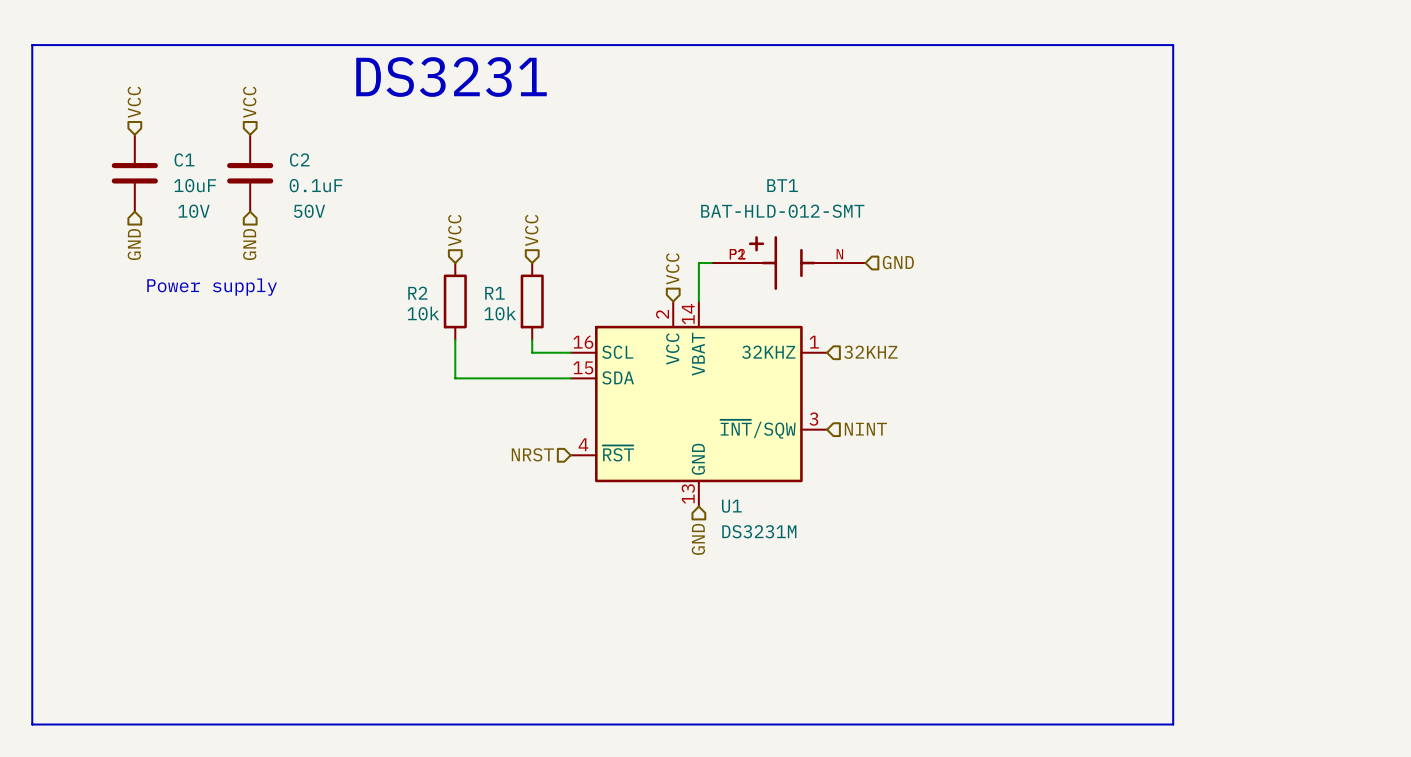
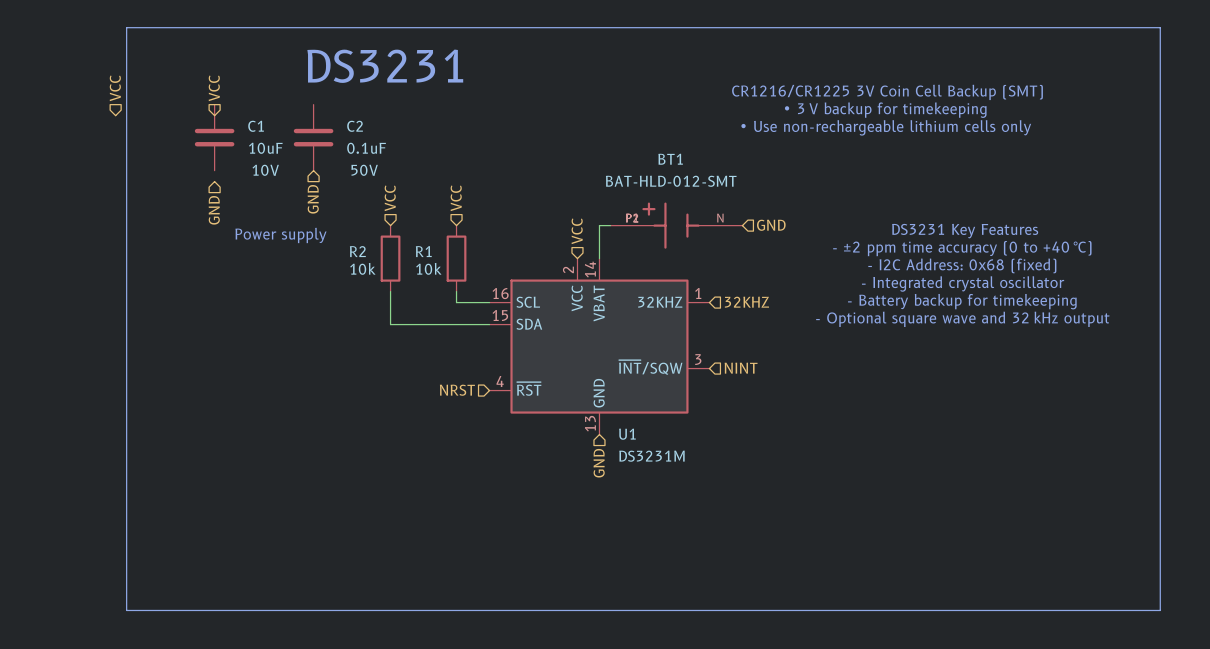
line: (32, 45) (1173, 45) (1173, 724) (32, 724) (32, 45) -> (126, 27) (126, 610) (1160, 610) (1160, 27) (126, 27)
text: none -> CR1216/CR1225 3V Coin Cell Backup (SMT) (887, 92)
text: none -> • 3 V backup for timekeeping (885, 110)
text: none -> • Use non-rechargeable lithium cells only (886, 127)
C1 position: (134, 173) -> (214, 137)
C2 position: (250, 173) -> (313, 137)
hierarchical label position: GND (134, 244) -> GND (313, 199)
text: none -> DS3231 Key Features (965, 231)
text position: Power supply (212, 287) -> Power supply (280, 235)
text: none -> - ±2 ppm time accuracy (0 to +40 °C) (962, 248)
text: none -> - I2C Address: 0x68 (fixed) (962, 265)
text: none -> - Integrated crystal oscillator (963, 283)
text: none -> - Battery backup for timekeeping (962, 301)
text: none -> - Optional square wave and 32 kHz output (962, 319)

